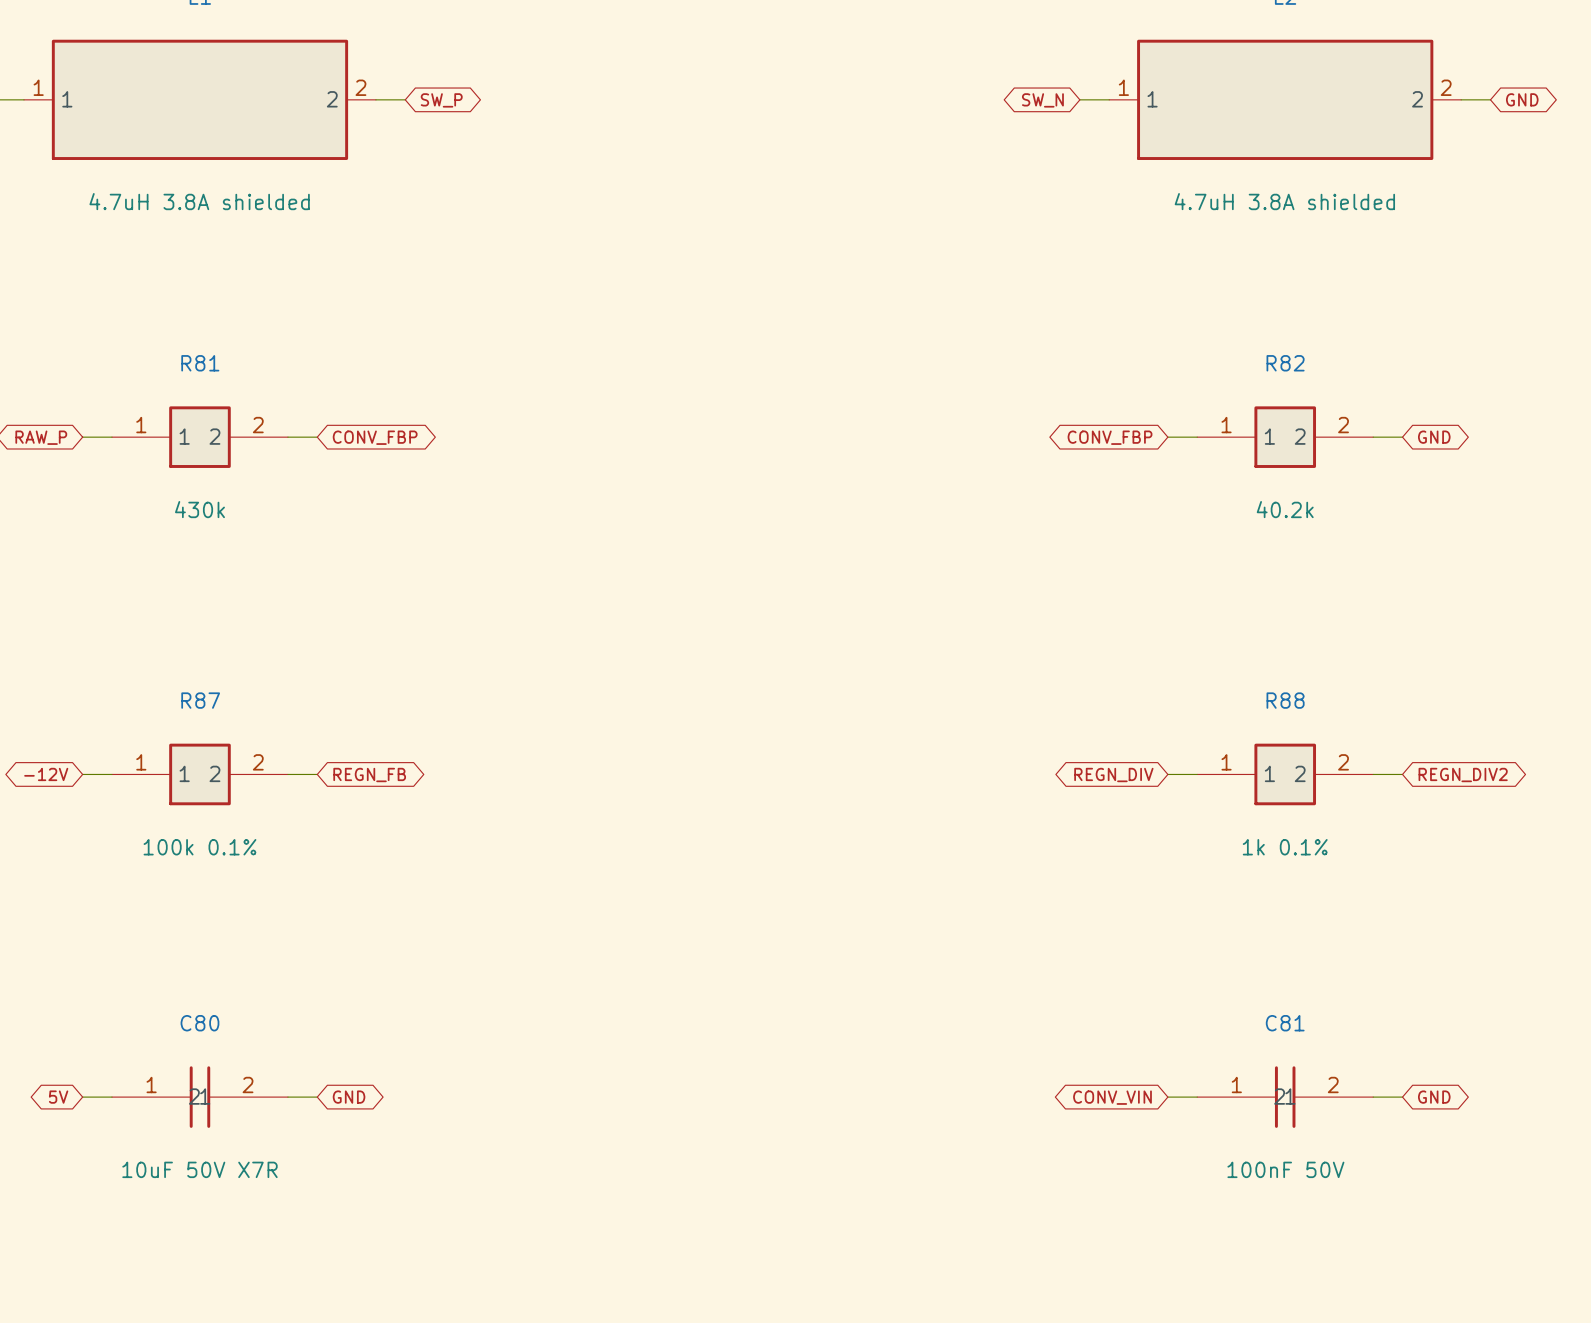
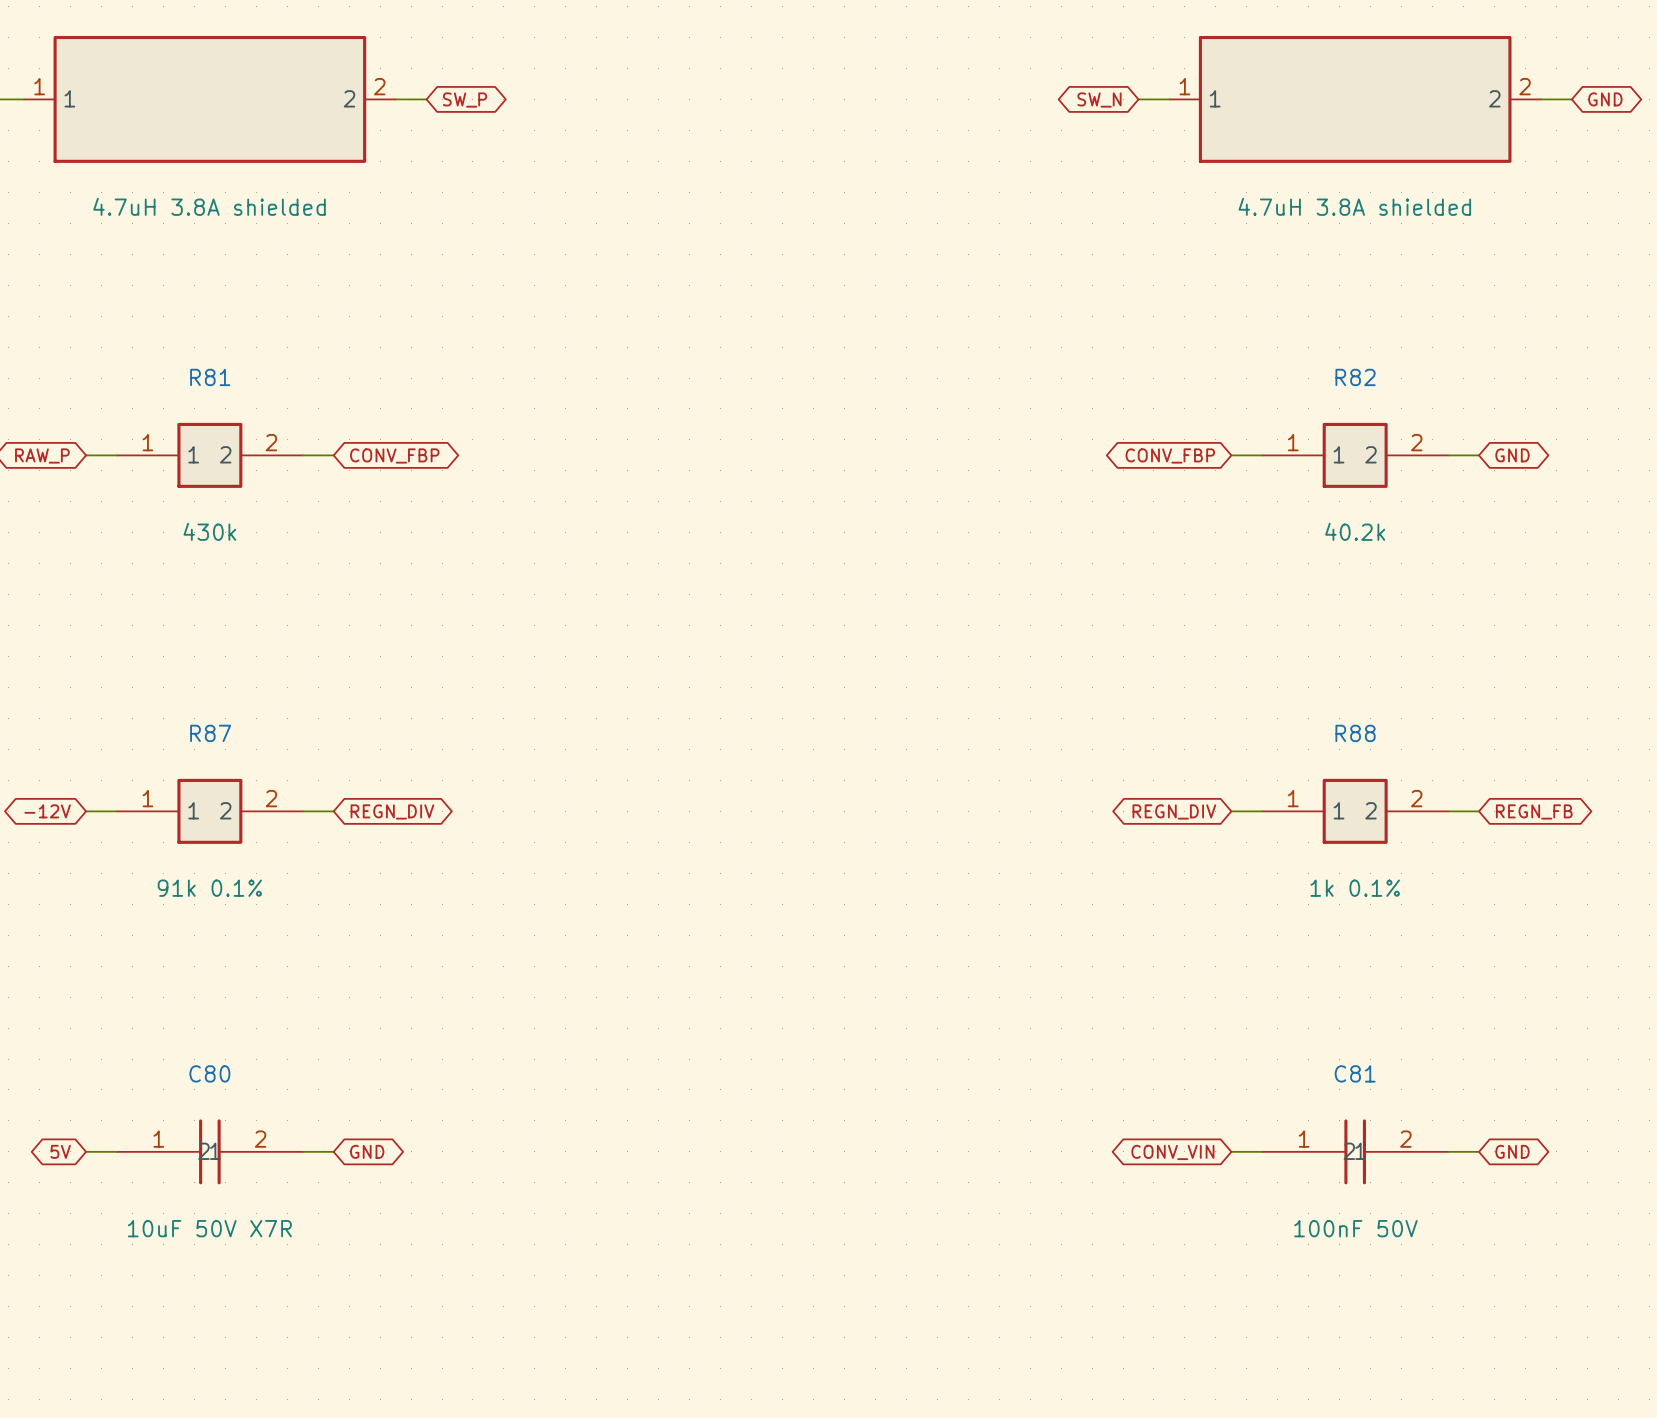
global label: REGN_FB (369, 775) -> REGN_DIV (392, 811)
global label: REGN_DIV2 (1463, 775) -> REGN_FB (1534, 811)
R87 value: 100k 0.1% (199, 847) -> 91k 0.1% (209, 888)

